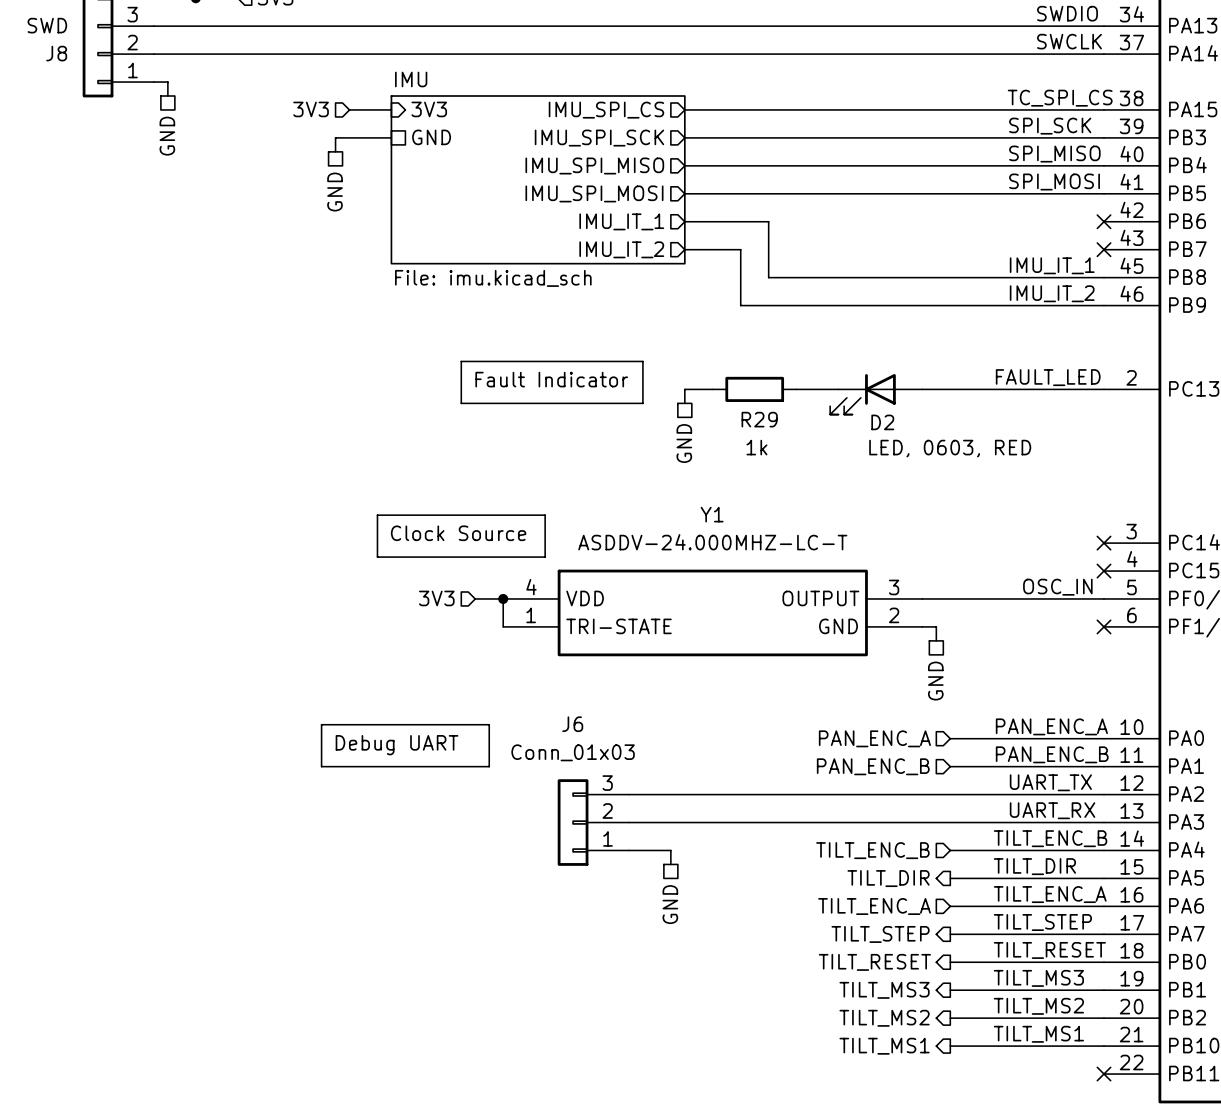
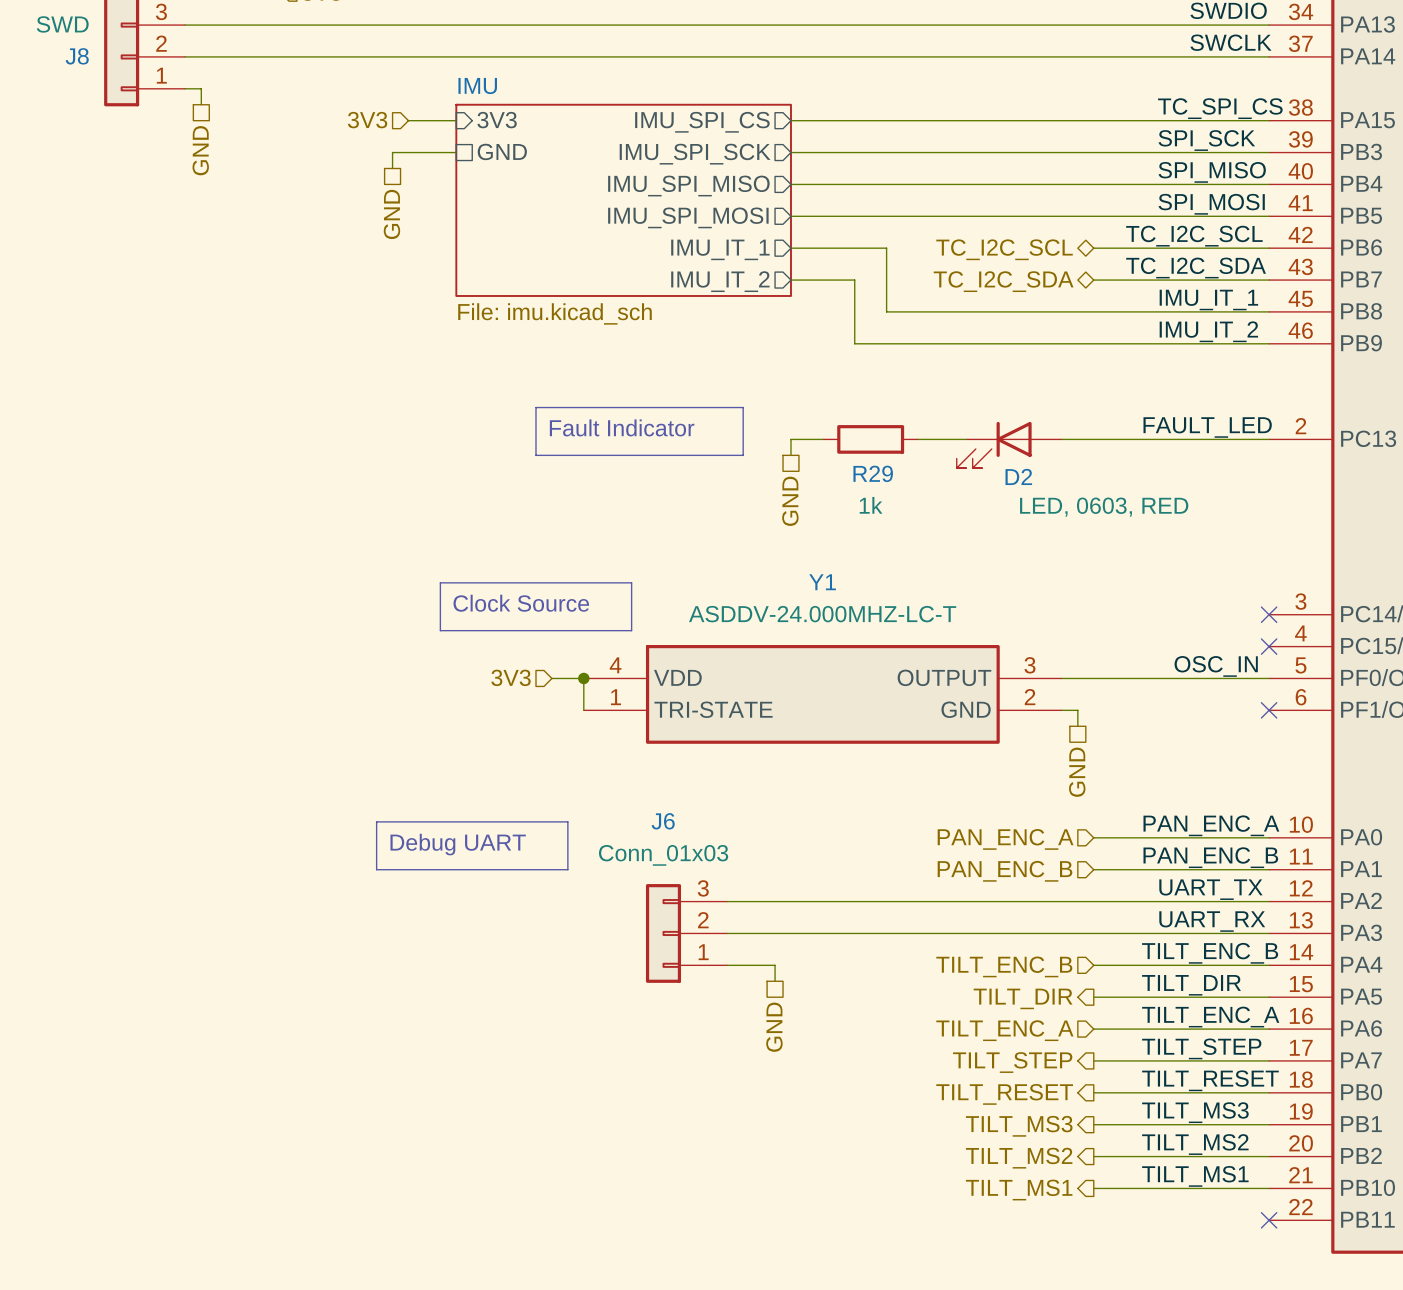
label: none -> TC_I2C_SCL (1194, 236)
hierarchical label: none -> TC_I2C_SCL (1004, 249)
wire: none -> (1093, 248) (1269, 248)
no-connect mark: (1104, 221) -> none
label: none -> TC_I2C_SDA (1196, 268)
hierarchical label: none -> TC_I2C_SDA (1003, 281)
wire: none -> (1093, 280) (1269, 280)
no-connect mark: (1104, 249) -> none

